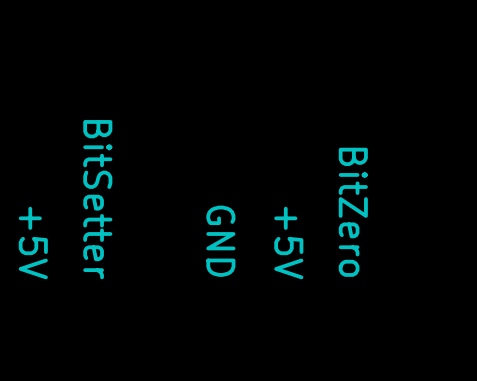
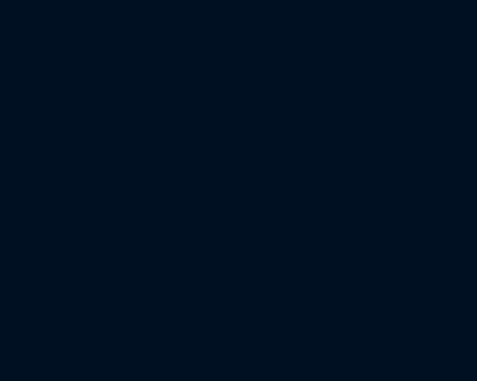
text: BitSetter (97, 199) -> none
text: BitZero (353, 212) -> none
text: GND (220, 241) -> none
text: +5V (33, 243) -> none
text: +5V (288, 243) -> none

